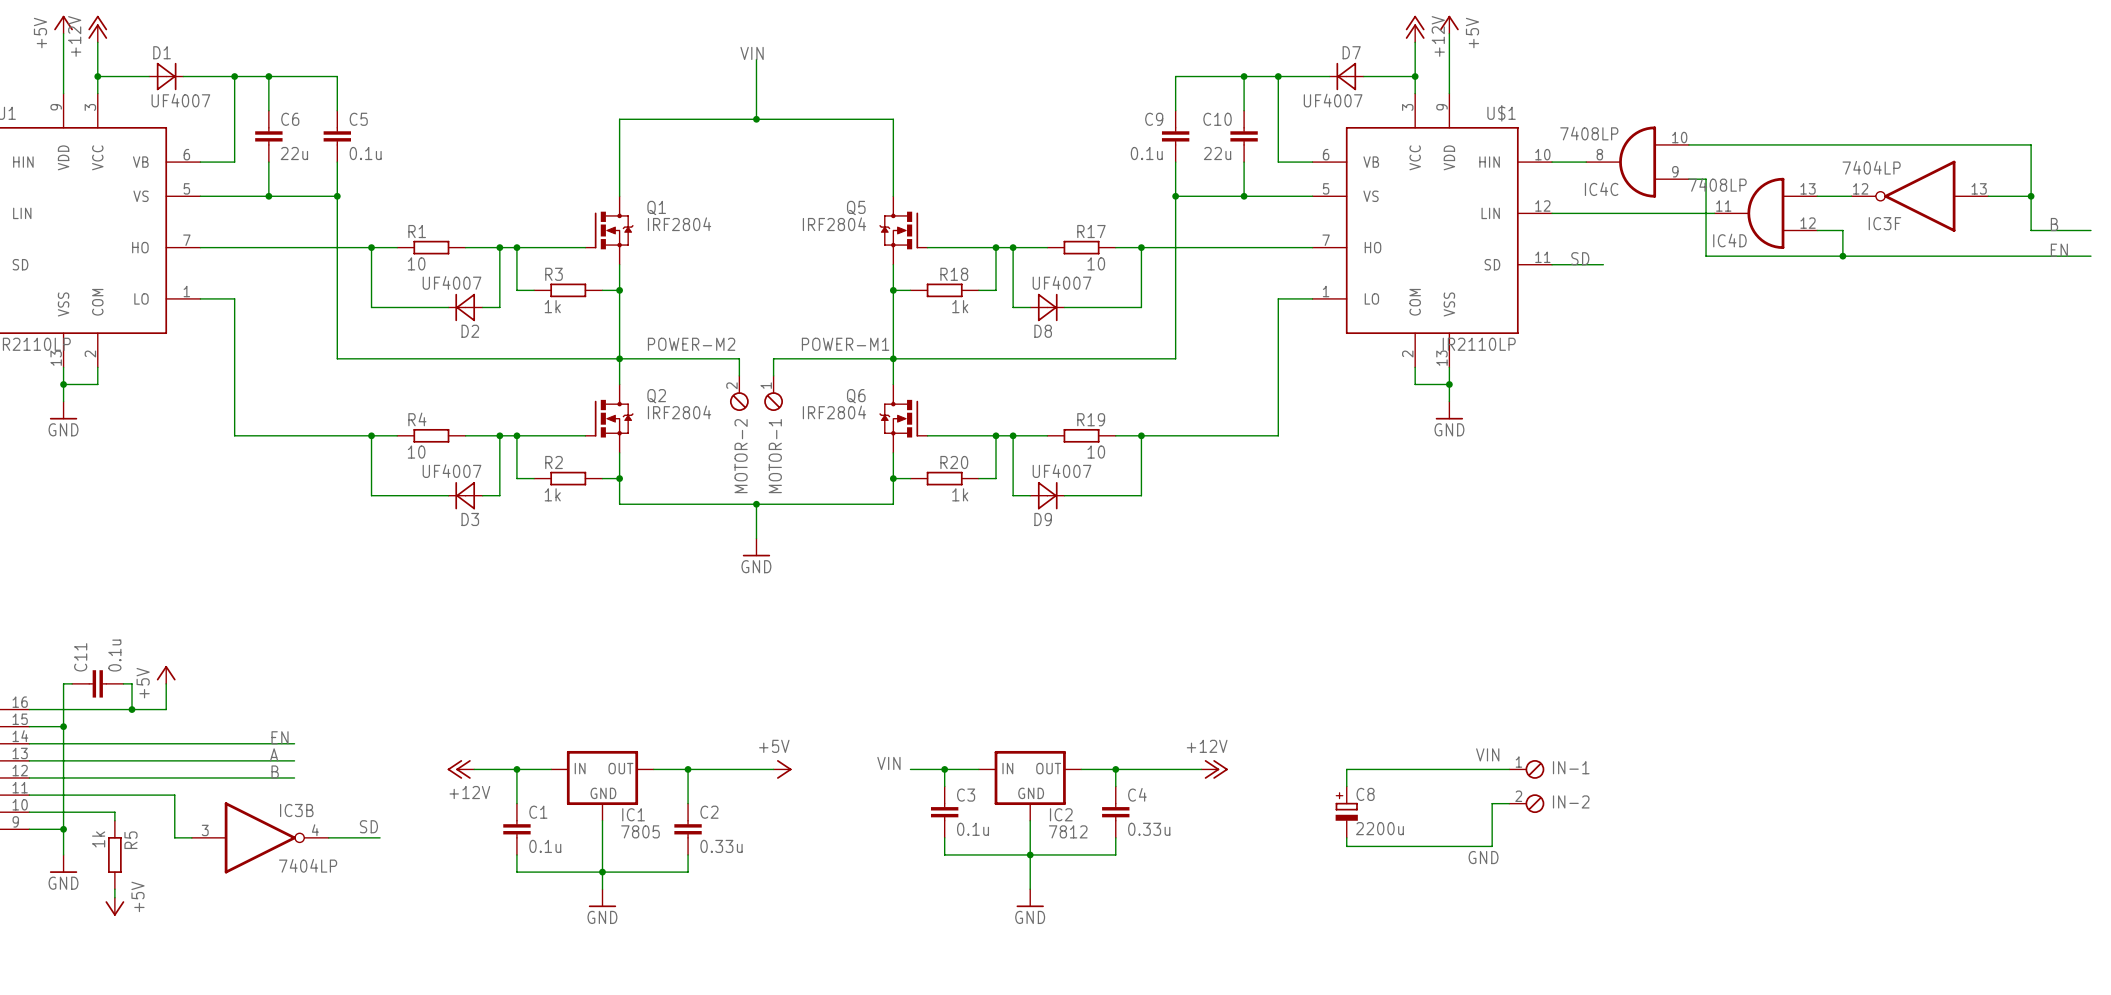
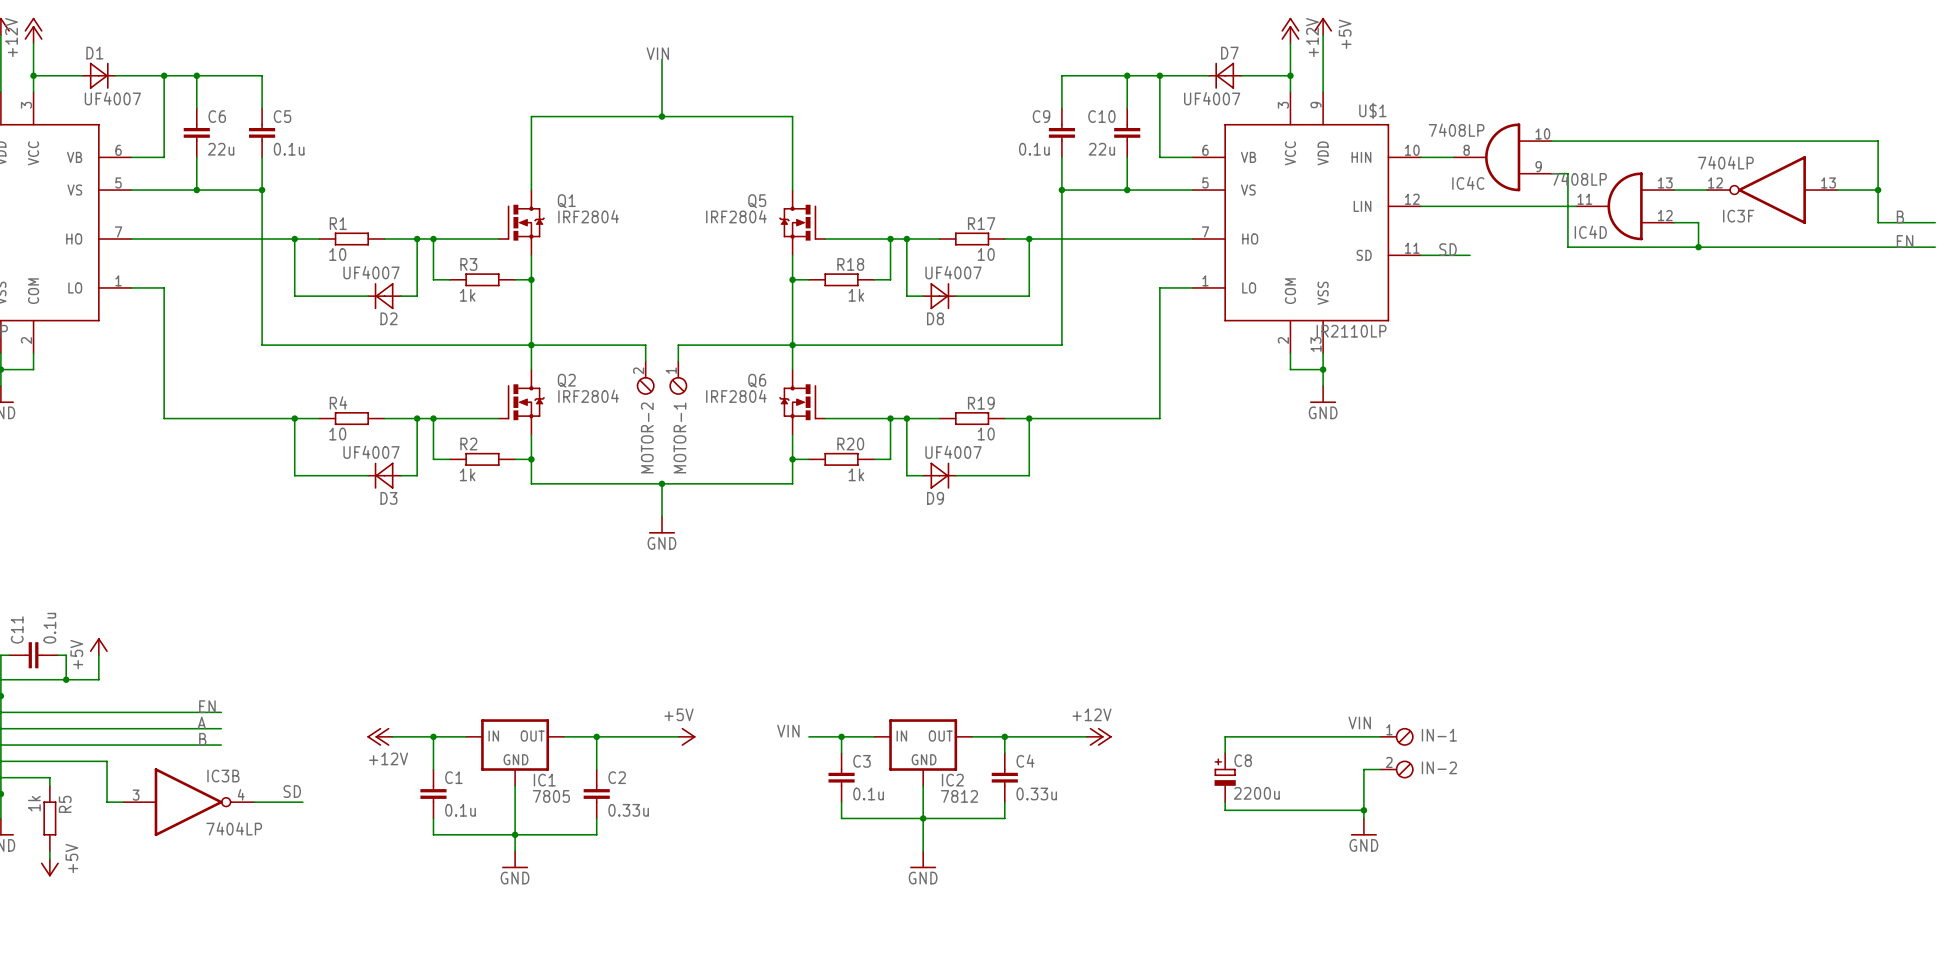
label: POWER-M2 (691, 344) -> none
label: POWER-M1 (845, 344) -> none
junction: none -> (1363, 810)
label: GND (1483, 857) -> none
power symbol: none -> GND (1363, 827)

